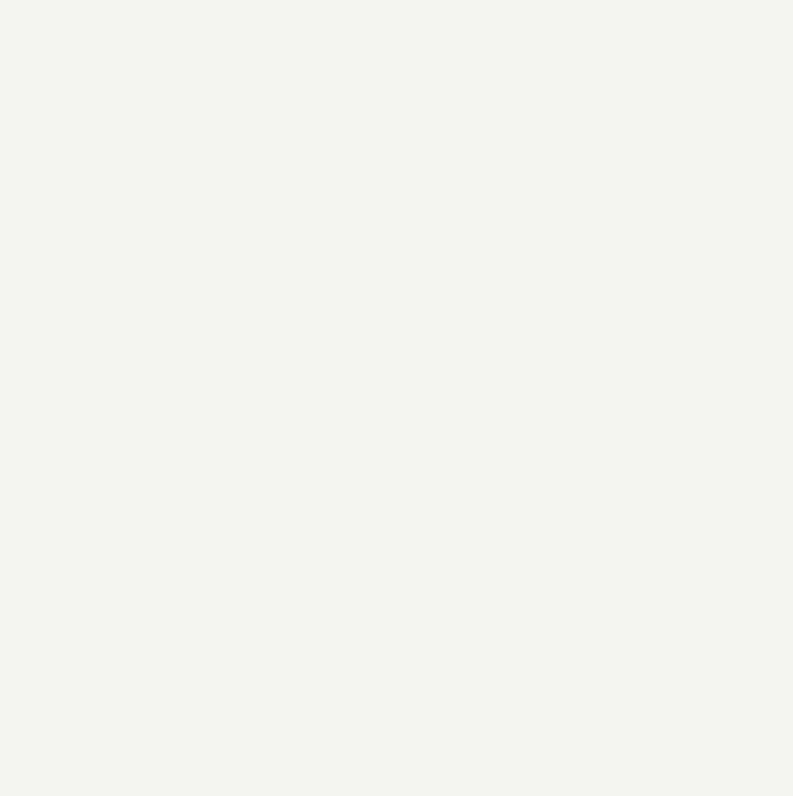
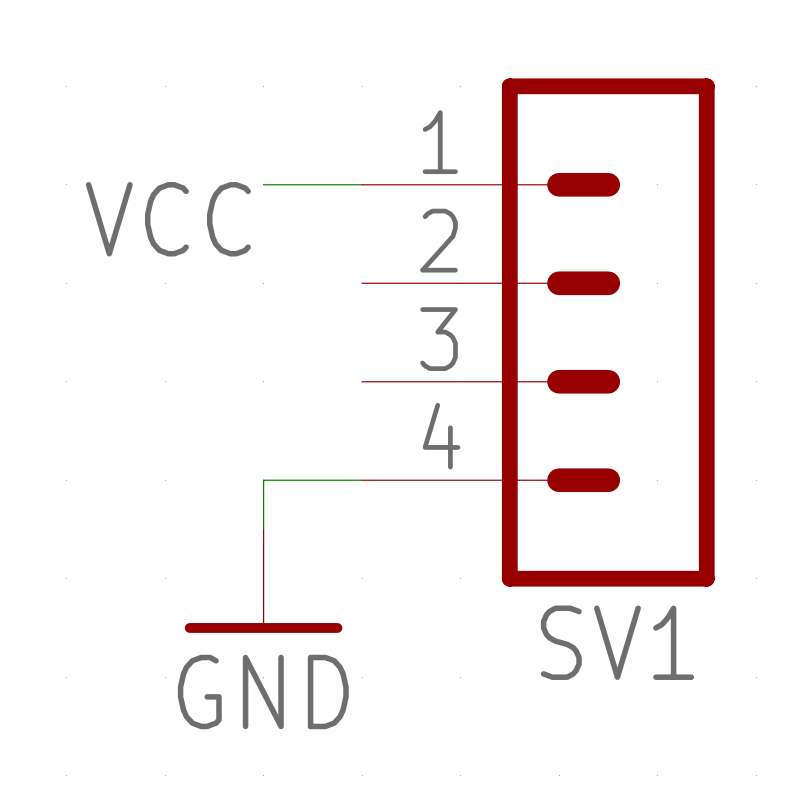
wire: none -> (263, 184) (362, 184)
label: none -> VCC (168, 219)
SV1: none -> (538, 332)
wire: none -> (362, 480) (263, 480) (263, 529)
power symbol: none -> GND (263, 581)

